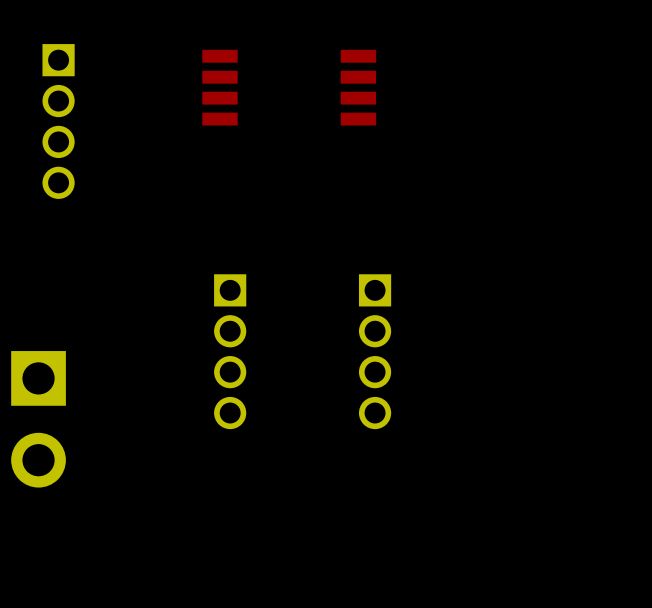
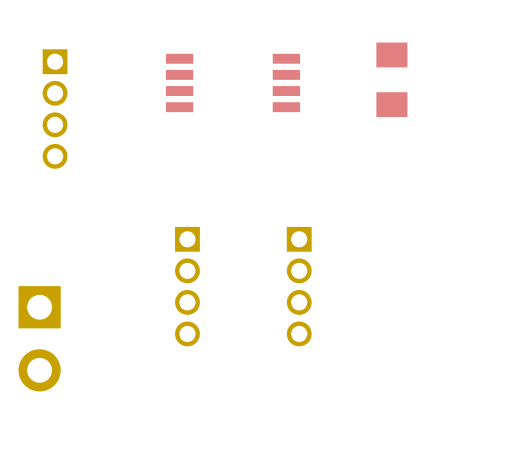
part: none -> (391, 79)

